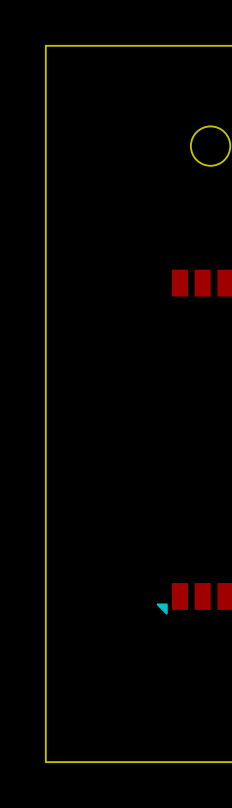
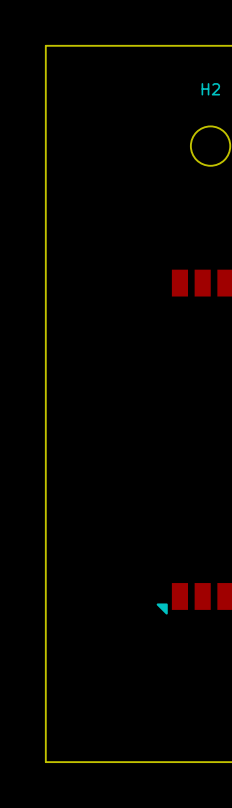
H2 name: none -> H2 (210, 89)

